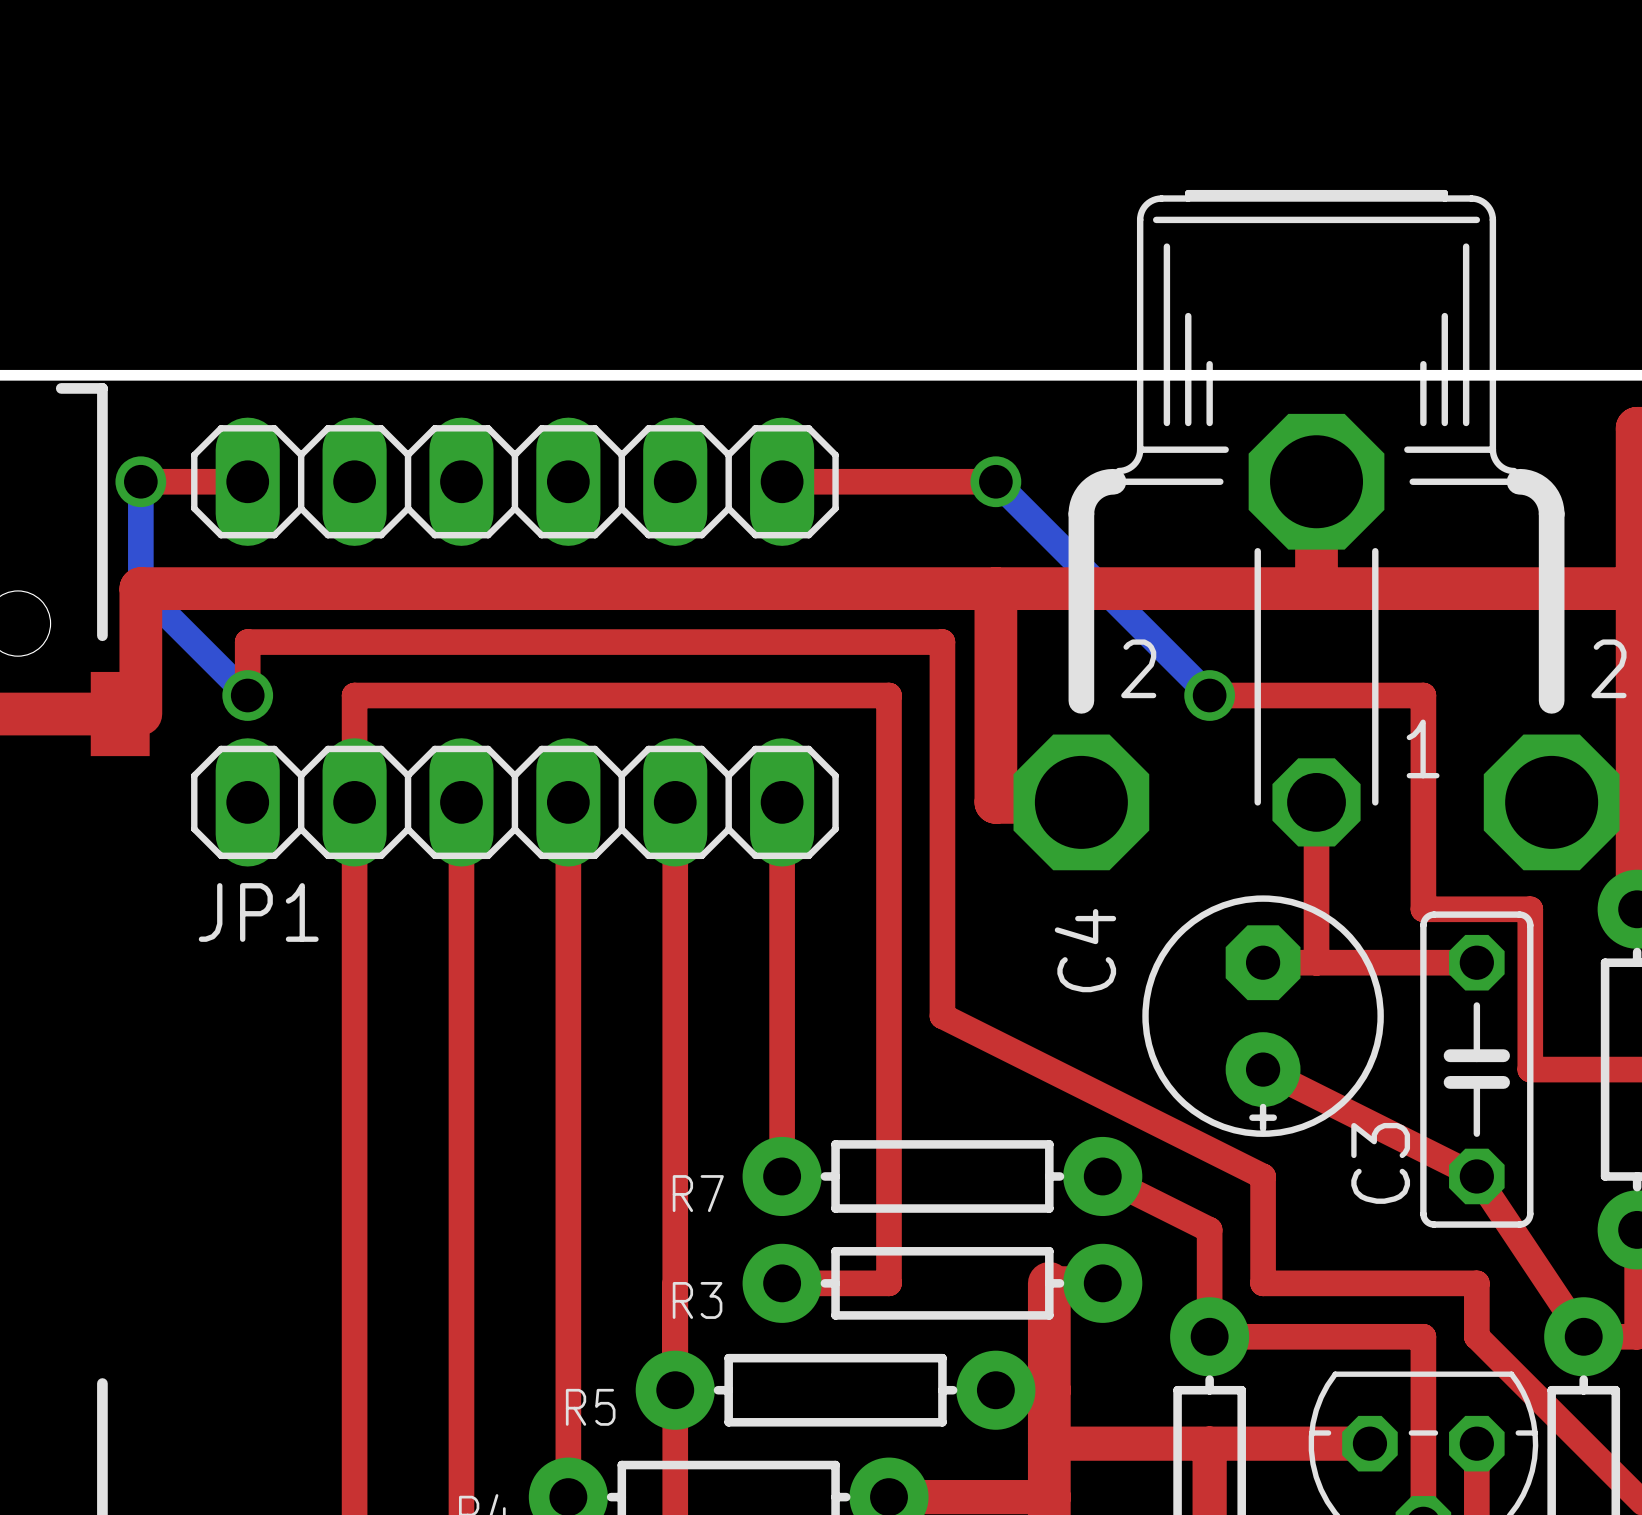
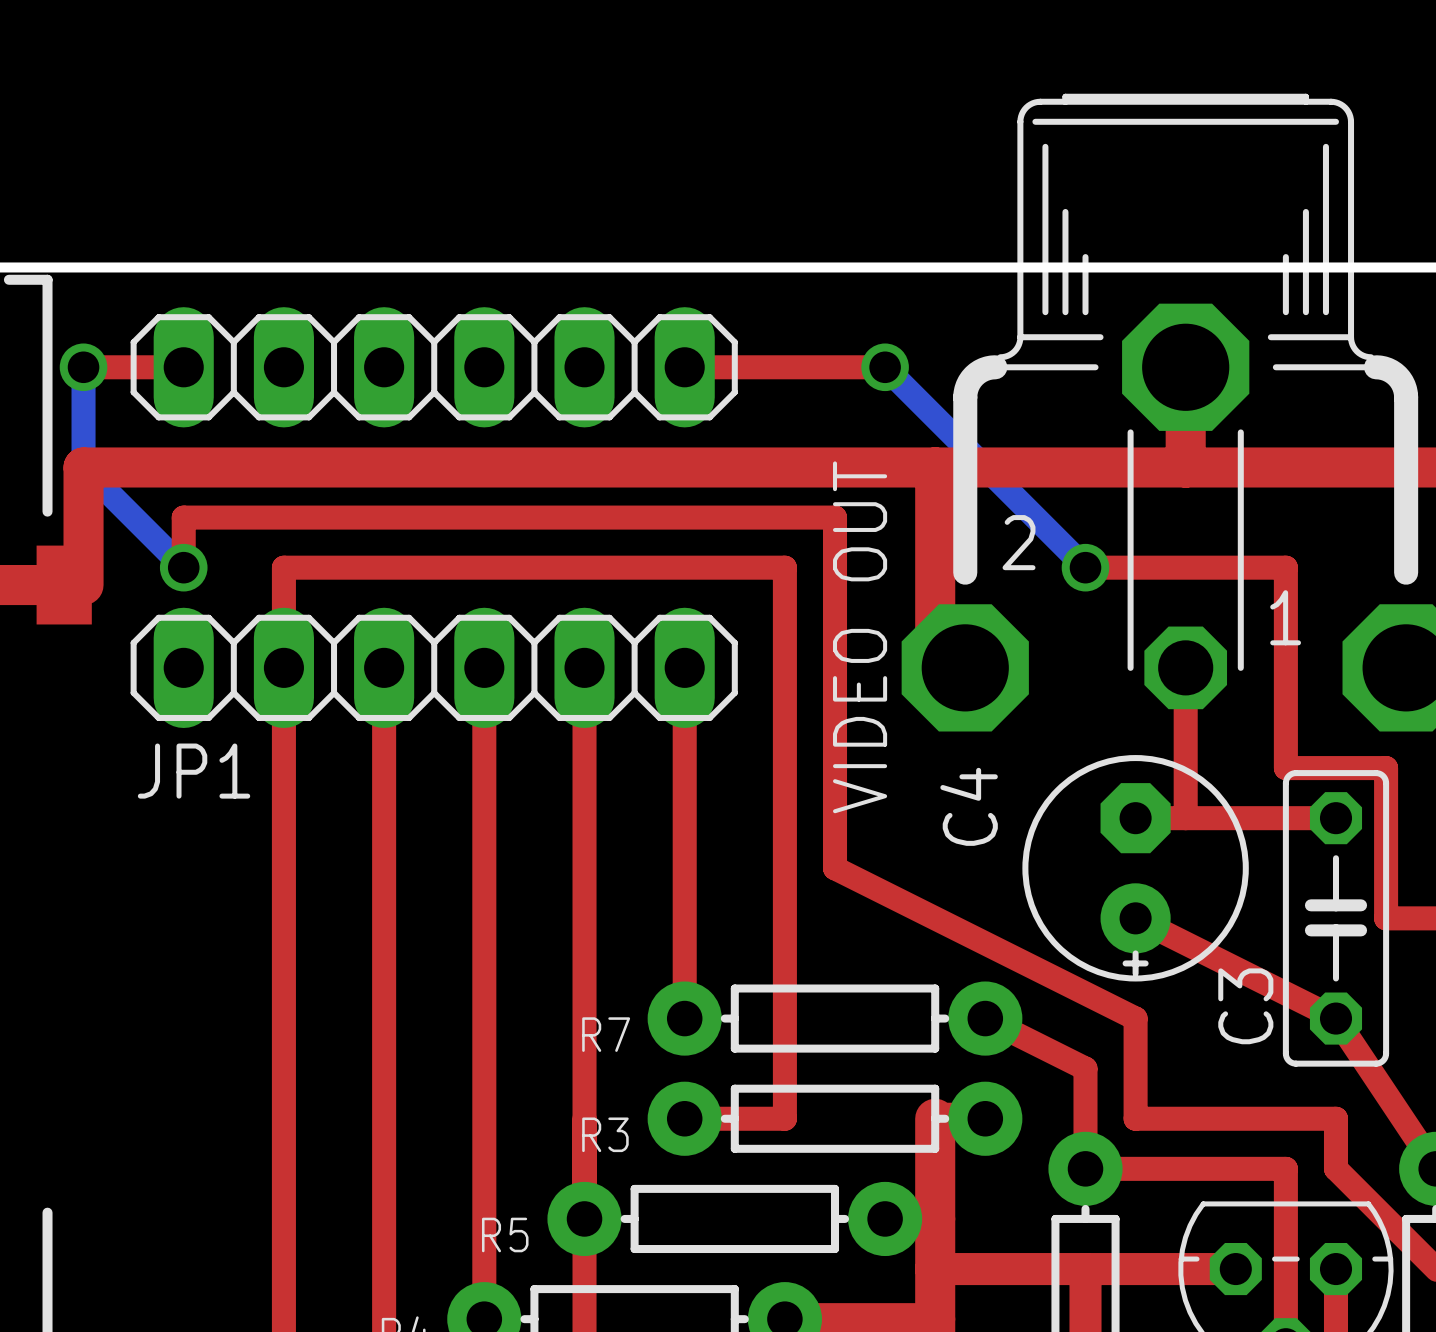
top track: (995, 588) (995, 802) (1049, 802) -> (935, 467) (935, 667)
text: none -> VIDEO OUT (860, 637)

